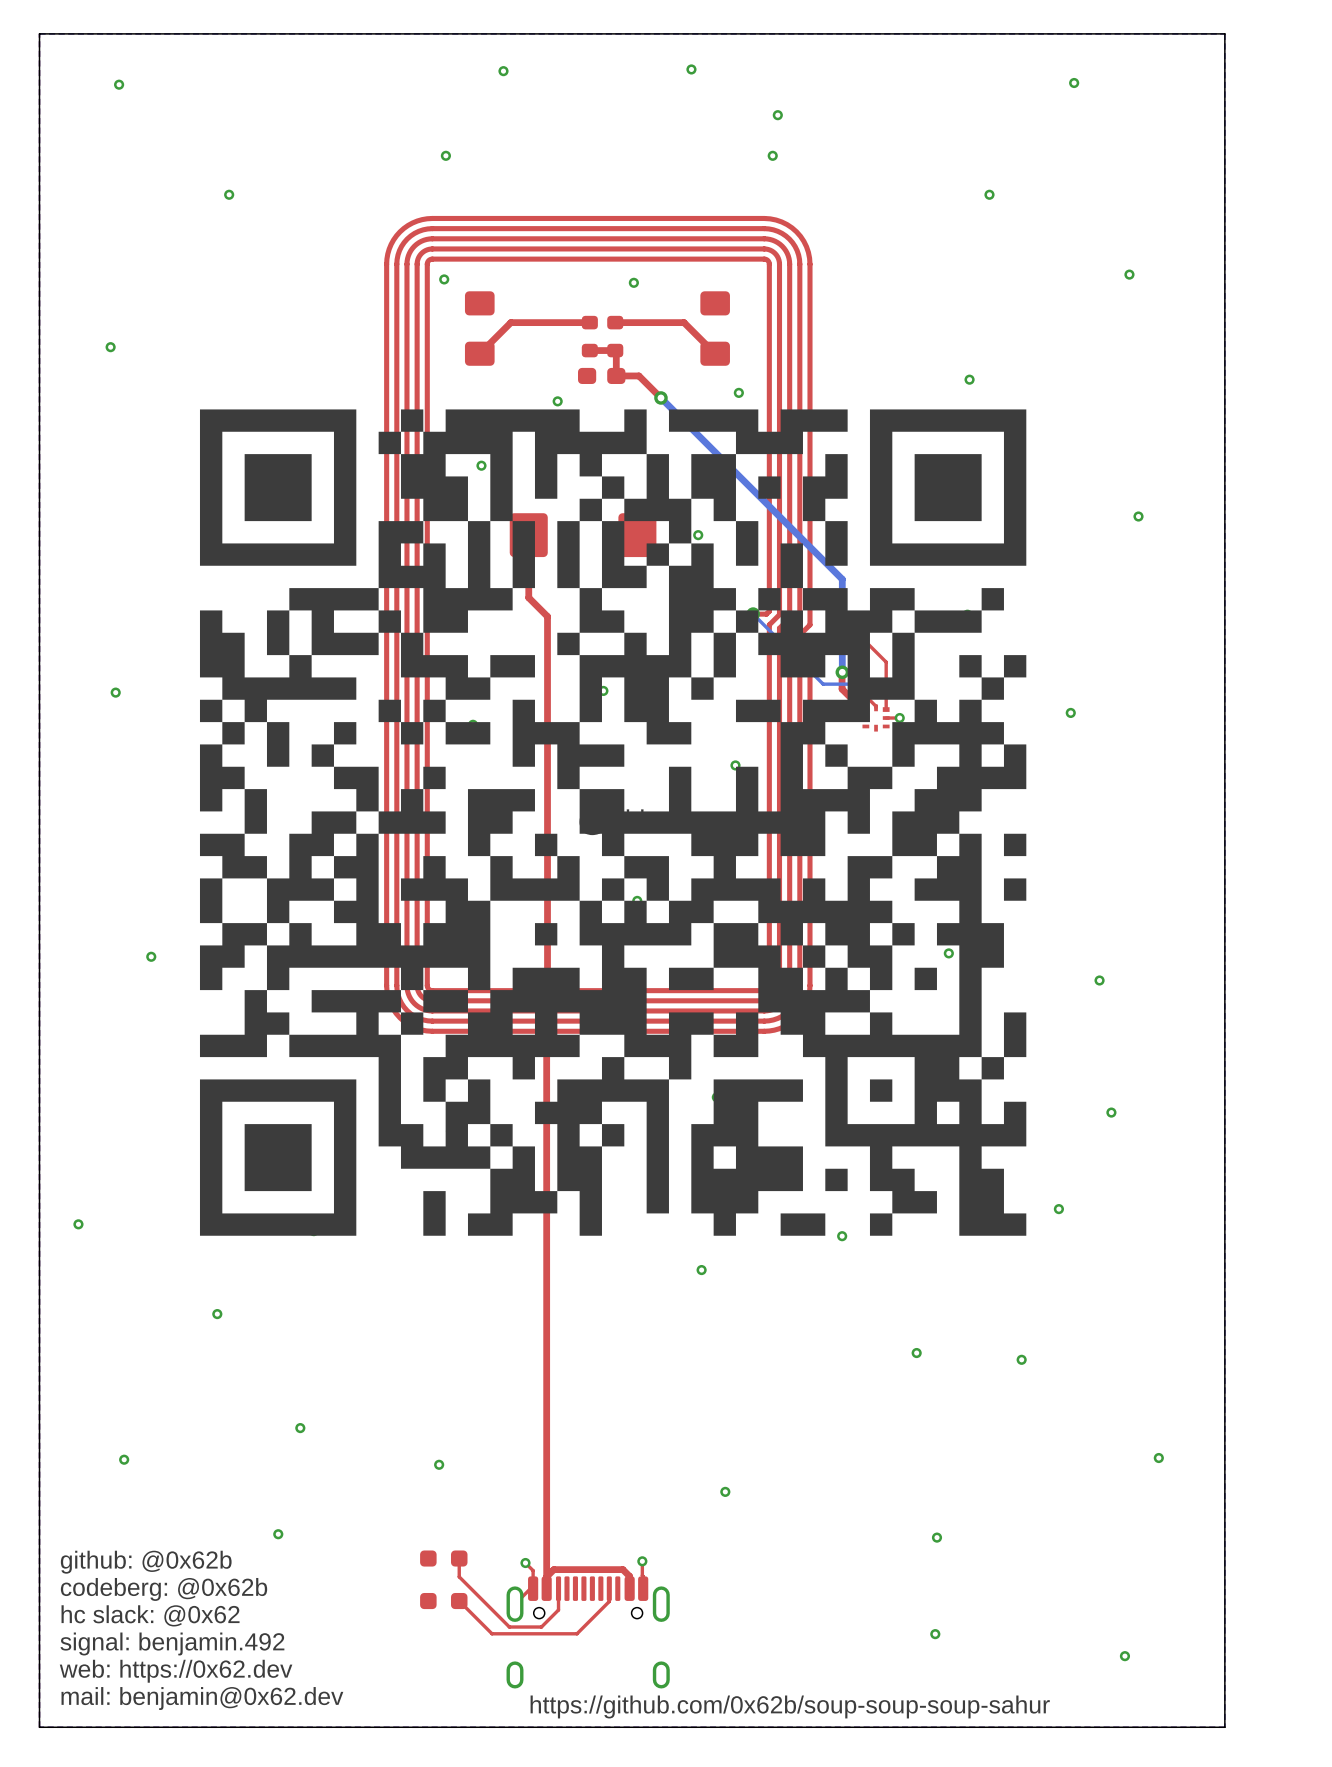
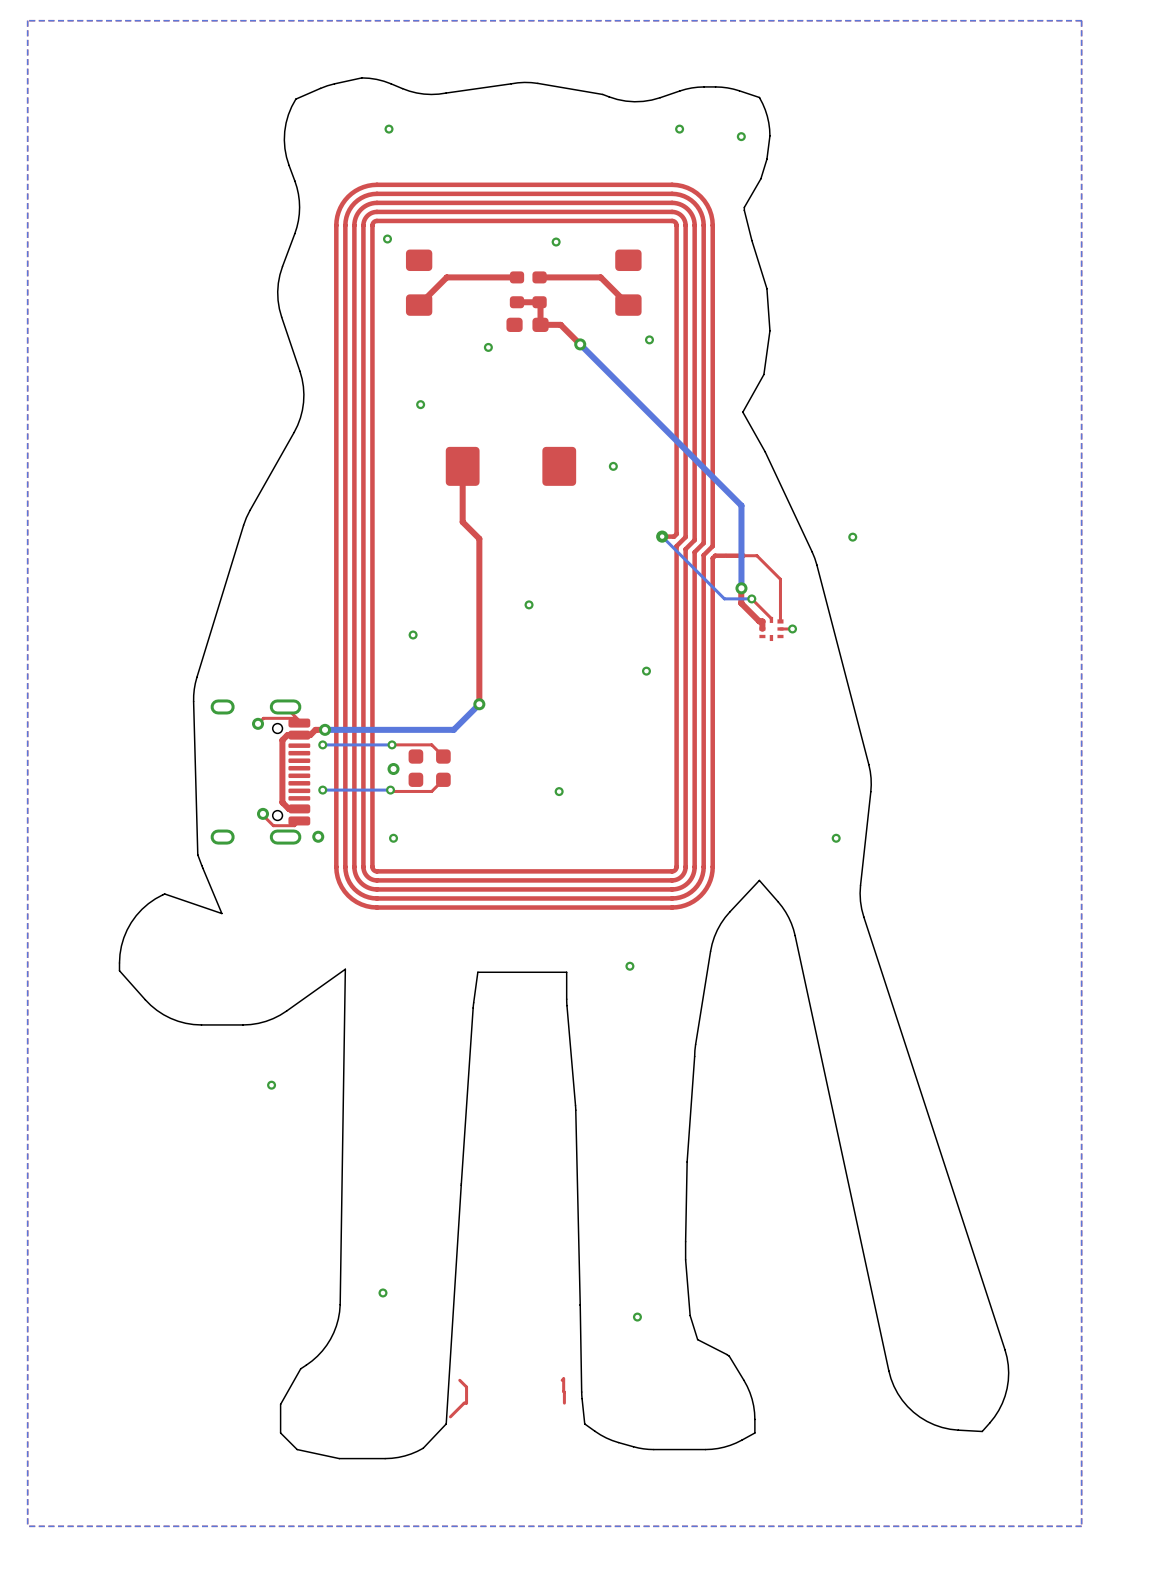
board edge: (1224, 33) (39, 33) (39, 1727) (1224, 1727) (1224, 33) -> (361, 77) (383, 81) (409, 91) (423, 94) (438, 94) (531, 82) (634, 101) (651, 100) (691, 87) (721, 87) (759, 97) (762, 103) (769, 129) (766, 159) (760, 178) (744, 210) (766, 288) (769, 330) (763, 374) (742, 412) (765, 451) (814, 558) (868, 764) (871, 784) (860, 885) (861, 909) (1007, 1357) (1008, 1372) (1005, 1396) (994, 1417) (982, 1431) (950, 1429) (927, 1421) (907, 1406) (893, 1386) (888, 1370) (793, 929) (782, 906) (759, 880) (720, 923) (710, 951) (694, 1050) (687, 1161) (685, 1241) (690, 1315) (697, 1339) (729, 1356) (749, 1392) (754, 1412) (754, 1432) (736, 1443) (717, 1448) (648, 1449) (612, 1440) (584, 1423) (581, 1392) (575, 1107) (566, 1005) (566, 972) (477, 972) (473, 1007) (446, 1423) (423, 1448) (411, 1453) (391, 1458) (339, 1458) (297, 1449) (280, 1432) (280, 1404) (300, 1368) (317, 1356) (326, 1345) (333, 1332) (339, 1311) (345, 969) (286, 1011) (265, 1021) (243, 1024) (193, 1024) (170, 1018) (150, 1005) (119, 970) (119, 954) (123, 937) (136, 915) (148, 903) (164, 893) (221, 913) (197, 854) (193, 695) (196, 677) (246, 517) (294, 432) (302, 410) (303, 394) (302, 378) (278, 300) (279, 274) (296, 227) (299, 207) (296, 187) (284, 148) (286, 122) (295, 99) (327, 85) (361, 77)
via: (691, 69) -> none
via: (503, 71) -> none
via: (1074, 83) -> none
via: (119, 84) -> none
via: (777, 115) -> none
via: none -> (741, 136)
via: (229, 194) -> none
via: (989, 194) -> none
via: (1129, 274) -> none
via: (110, 347) -> none
via: (969, 379) -> none
via: (1138, 516) -> none
via: (115, 692) -> none
via: (1070, 712) -> none
top track: (547, 802) (547, 977) -> none
bottom track: none -> (479, 704) (453, 729) (325, 729)
via: none -> (479, 704)
top track: none -> (285, 706) (299, 720) (299, 723) (294, 718) (263, 718) (258, 723)
part: (613, 822) -> none
via: none -> (258, 723)
top track: none -> (325, 729) (315, 729) (310, 735) (287, 735) (282, 740) (282, 802) (288, 808) (299, 808)
via: none -> (325, 729)
via: none -> (322, 744)
top track: none -> (392, 744) (431, 744) (443, 756)
bottom track: none -> (392, 744) (322, 744)
via: none -> (392, 744)
part: none -> (429, 756)
via: none -> (393, 769)
part: none -> (260, 772)
part: none -> (429, 779)
top track: none -> (443, 779) (431, 791) (390, 790)
via: none -> (322, 790)
bottom track: none -> (390, 790) (322, 790)
via: none -> (390, 790)
top track: none -> (263, 813) (273, 825) (294, 825) (299, 820)
via: none -> (263, 813)
via: none -> (318, 836)
via: (151, 956) -> none
via: (1099, 980) -> none
top track: (547, 1043) (546, 1588) -> none
via: (1111, 1112) -> none
via: (1058, 1209) -> none
via: (78, 1224) -> none
via: (842, 1236) -> none
via: (701, 1270) -> none
via: (217, 1314) -> none
via: (916, 1353) -> none
via: (1021, 1359) -> none
via: (300, 1428) -> none
via: (1158, 1458) -> none
via: (124, 1459) -> none
via: (278, 1534) -> none
via: (936, 1537) -> none
part: (443, 1558) -> none
top track: (459, 1558) (459, 1576) (509, 1627) (541, 1627) (558, 1609) (558, 1588) -> none
via: (642, 1561) -> none
text: github: @0x62b (146, 1562) -> none
via: (525, 1563) -> none
top track: (546, 1576) (553, 1569) (622, 1569) (629, 1576) (629, 1588) -> none
top track: (609, 1588) (609, 1601) (577, 1633) (492, 1633) (459, 1601) -> none
text: codeberg: @0x62b (164, 1589) -> none
part: (443, 1601) -> none
text: hc slack: @0x62 (150, 1615) -> none
part: (588, 1632) -> none
via: (935, 1634) -> none
text: signal: benjamin.492 (172, 1643) -> none
via: (1124, 1656) -> none
text: web: https://0x62.dev (176, 1671) -> none
text: mail: benjamin@0x62.dev (202, 1698) -> none
text: https://github.com/0x62b/soup-soup-soup-sahur (790, 1706) -> none

